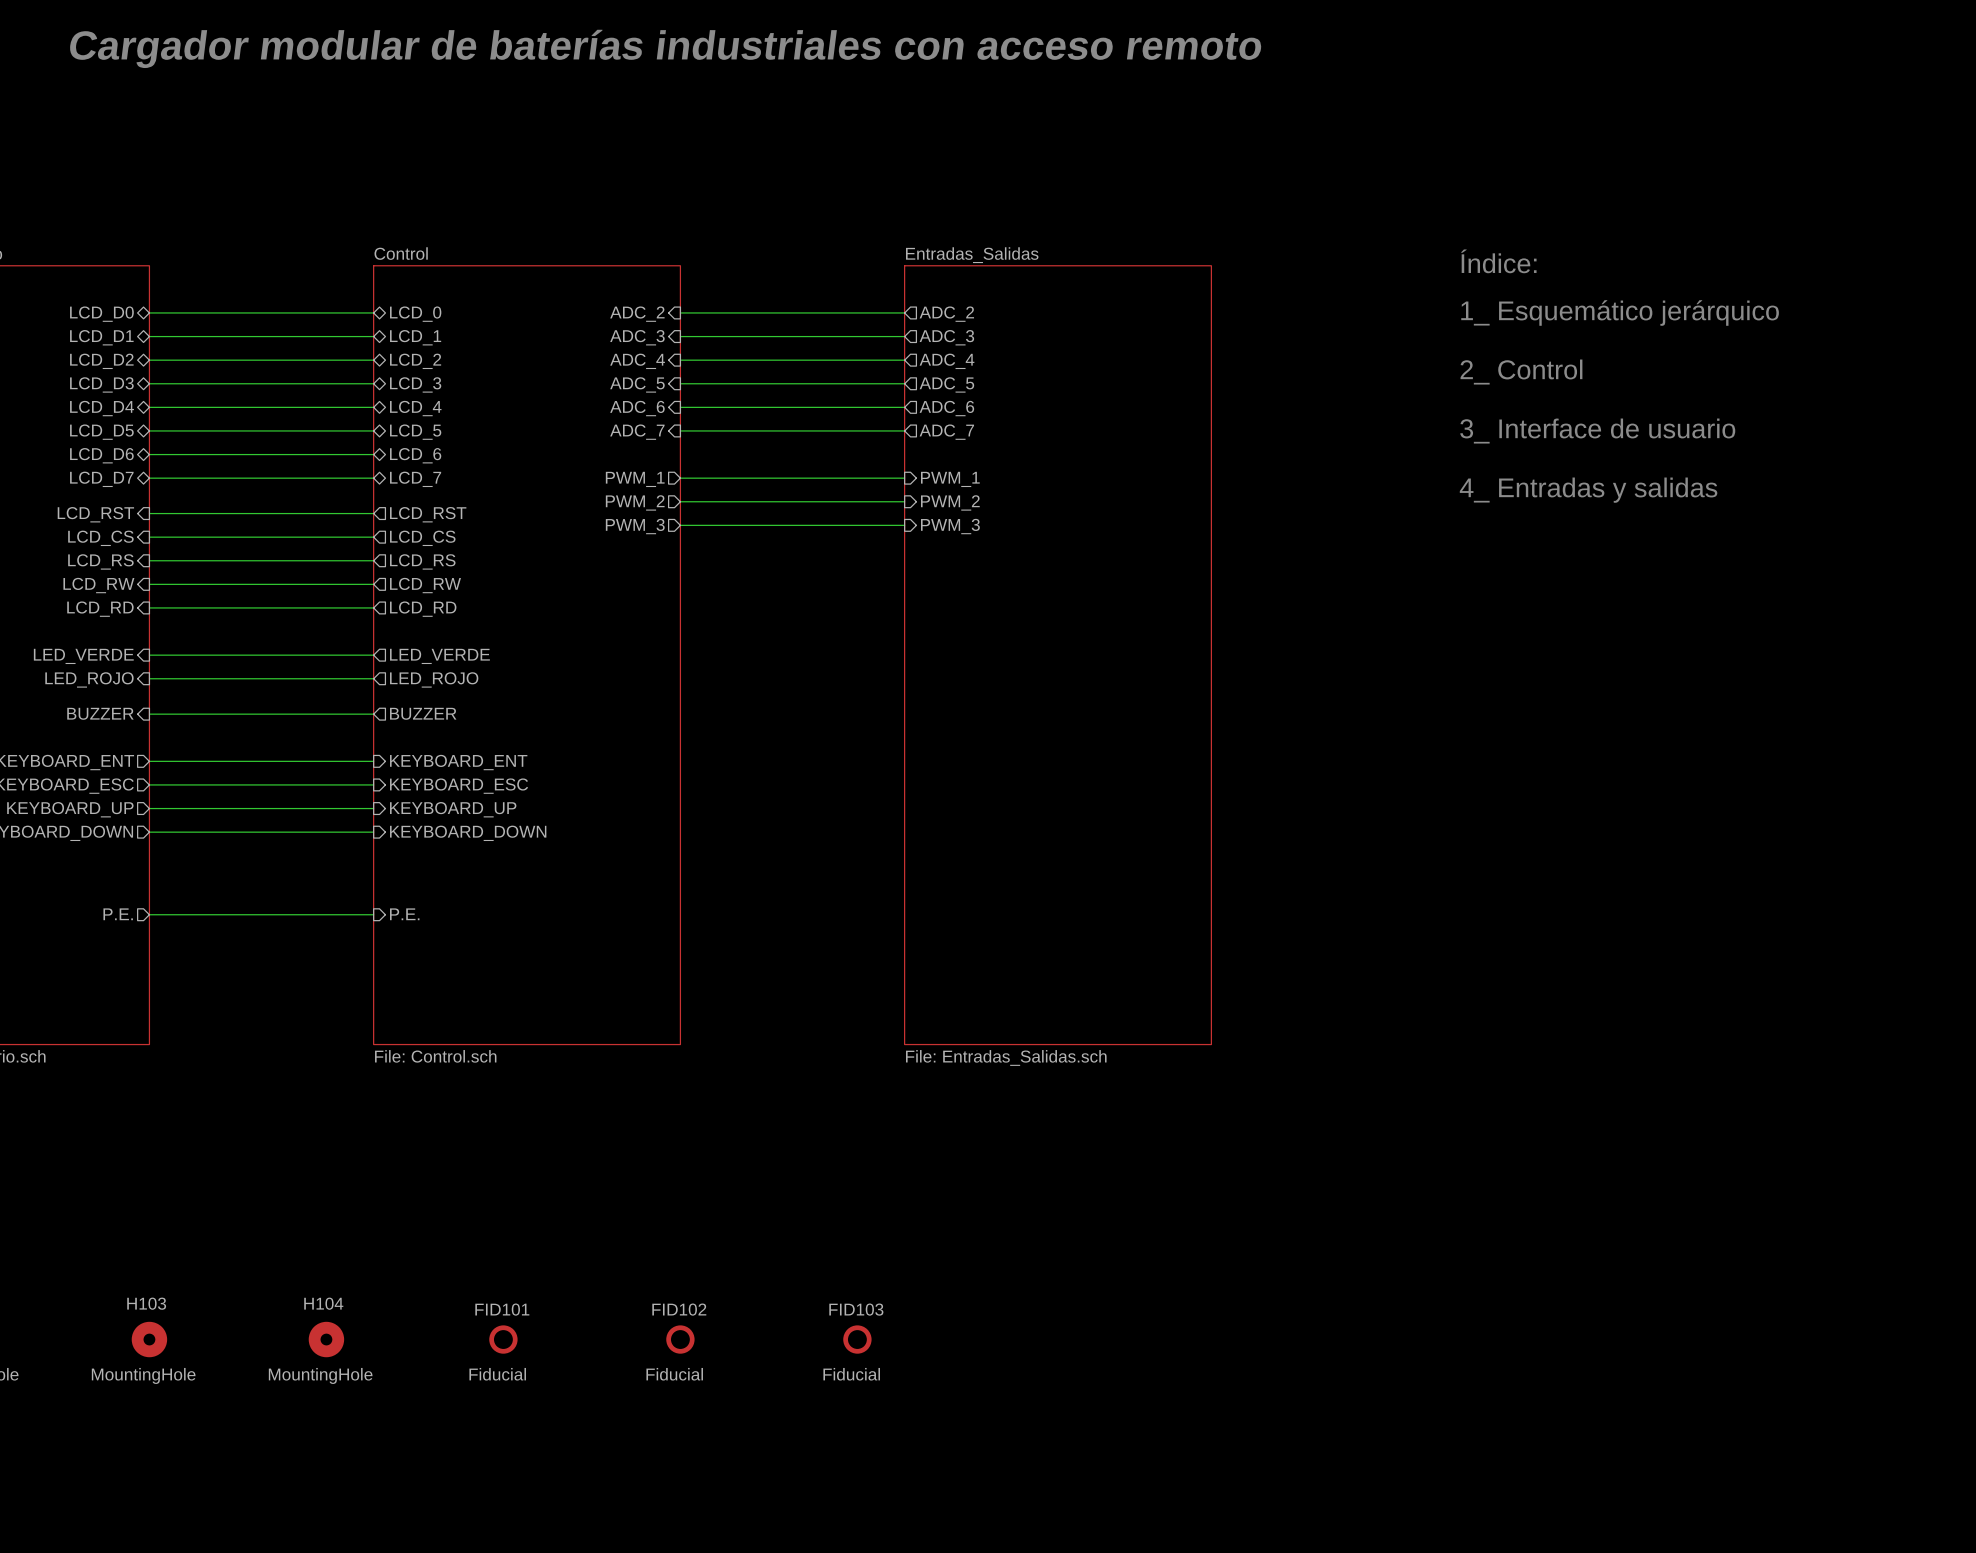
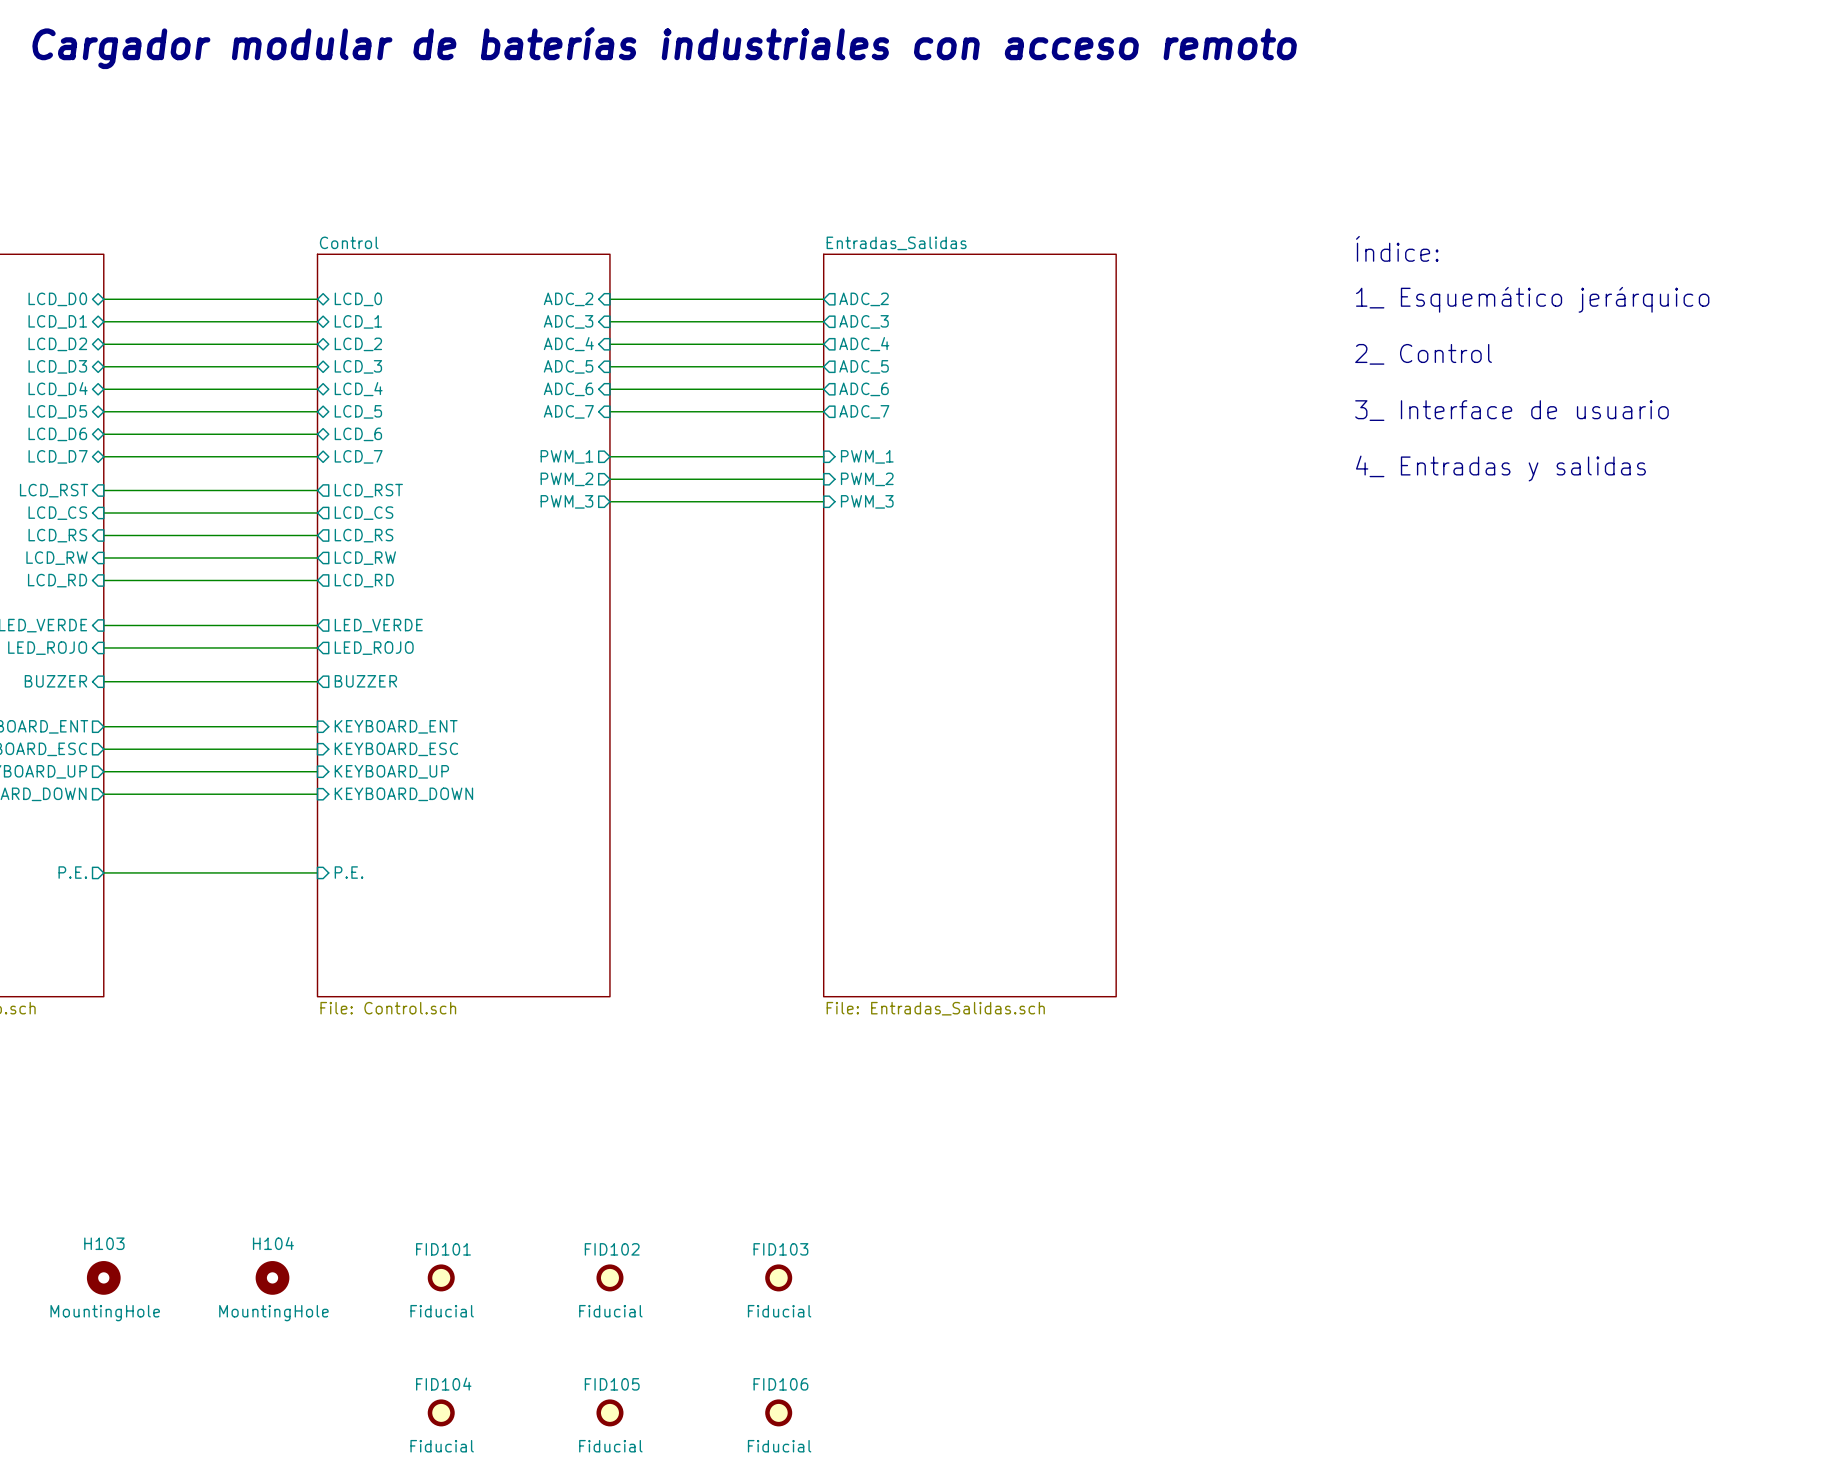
FID104: none -> Fiducial (441, 1412)
FID105: none -> Fiducial (609, 1412)
FID106: none -> Fiducial (778, 1412)

